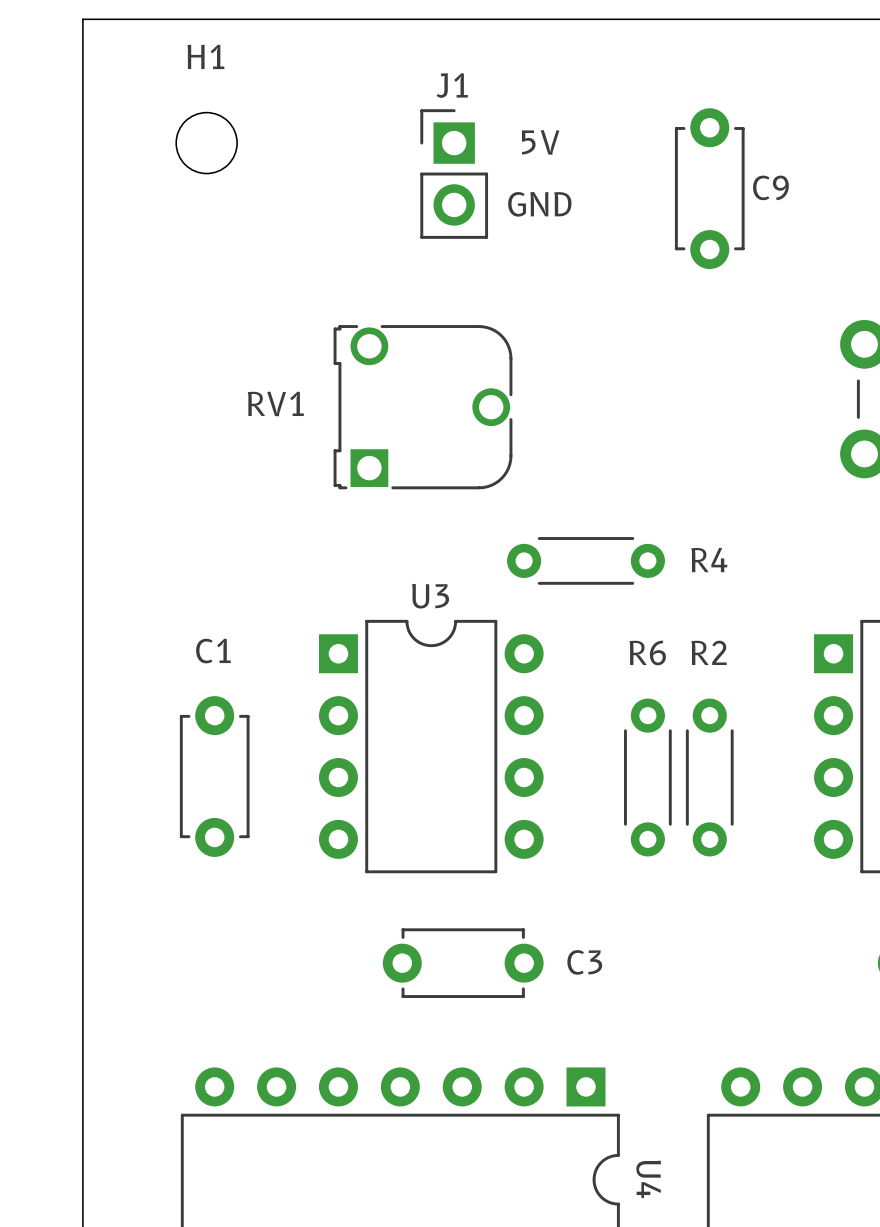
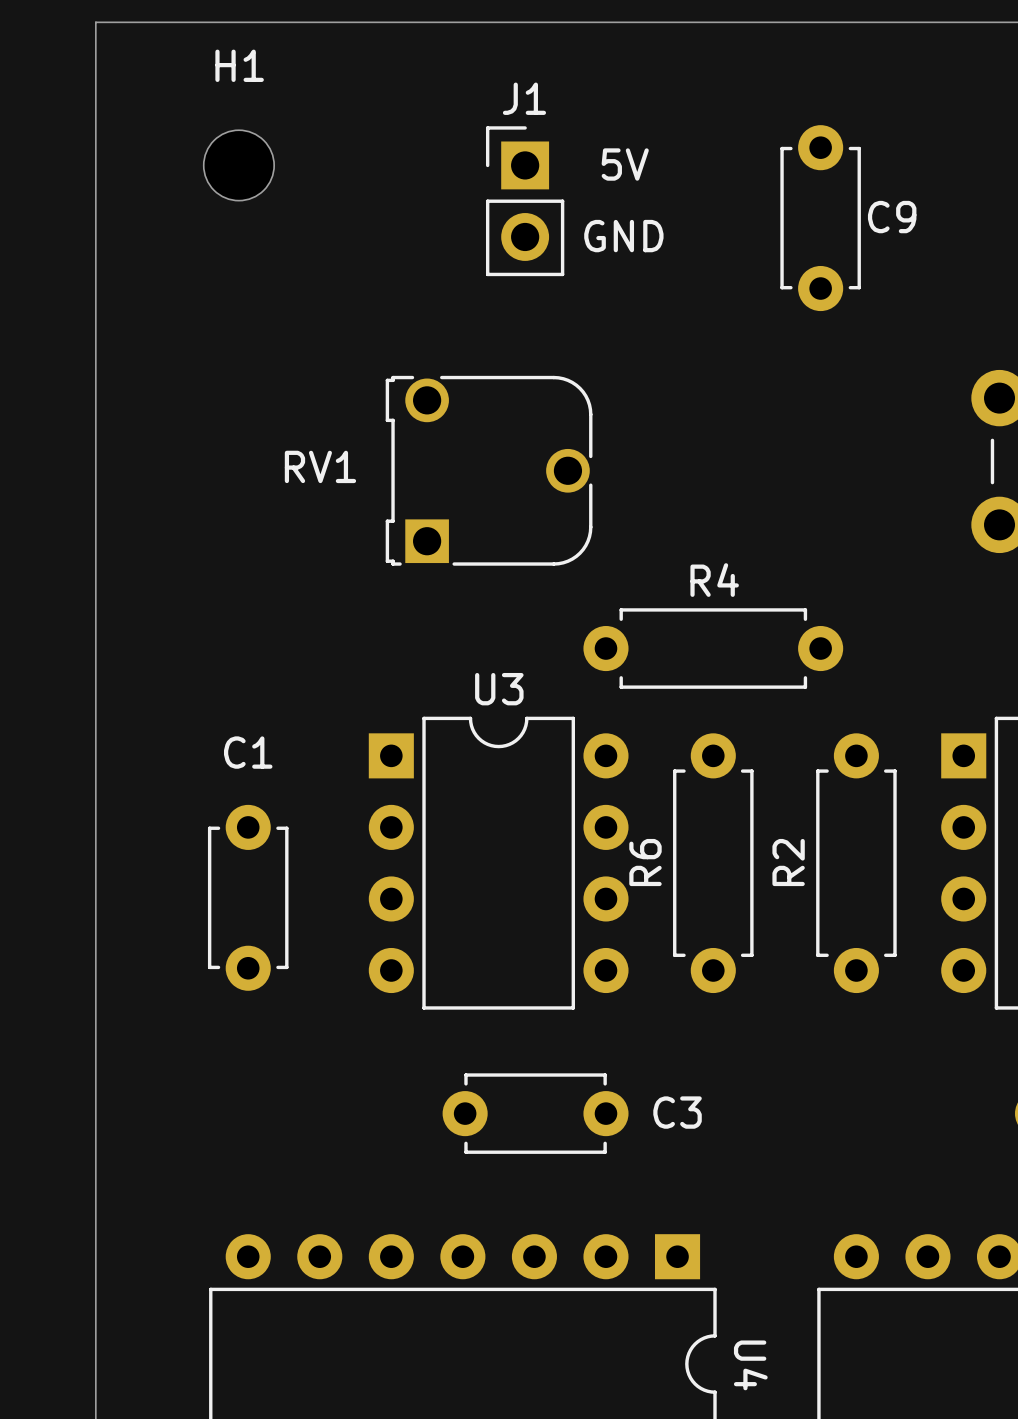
R4 footprint: [507, 537, 665, 585] -> [583, 608, 844, 689]
R4 name position: R4 (709, 560) -> R4 (714, 580)
R6 name position: R6 (647, 652) -> R6 (645, 862)
R2 name position: R2 (709, 652) -> R2 (788, 862)
R6 footprint: [624, 698, 672, 857] -> [673, 733, 754, 994]
R2 footprint: [685, 698, 734, 857] -> [816, 733, 897, 994]

